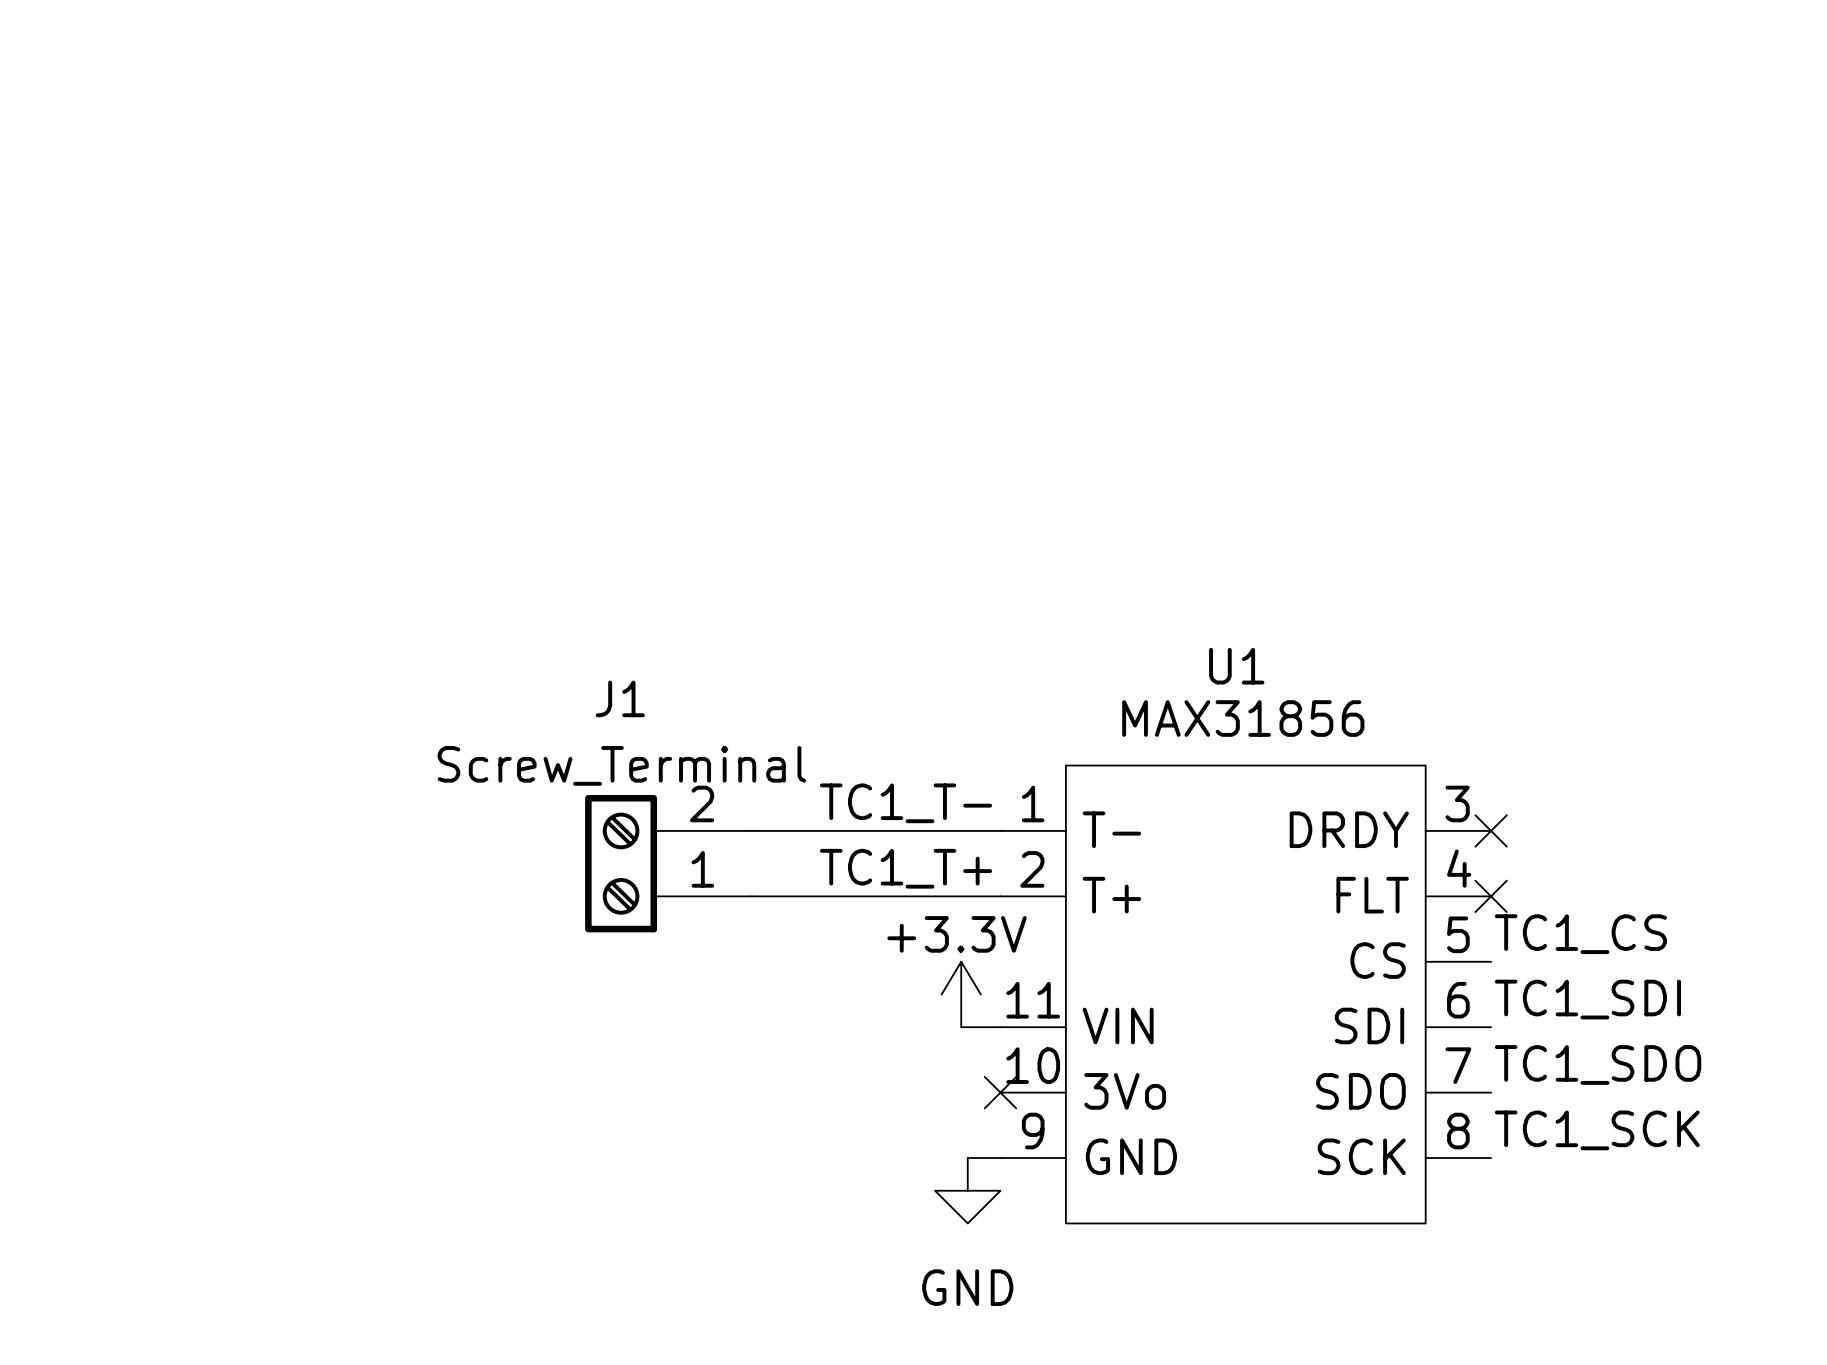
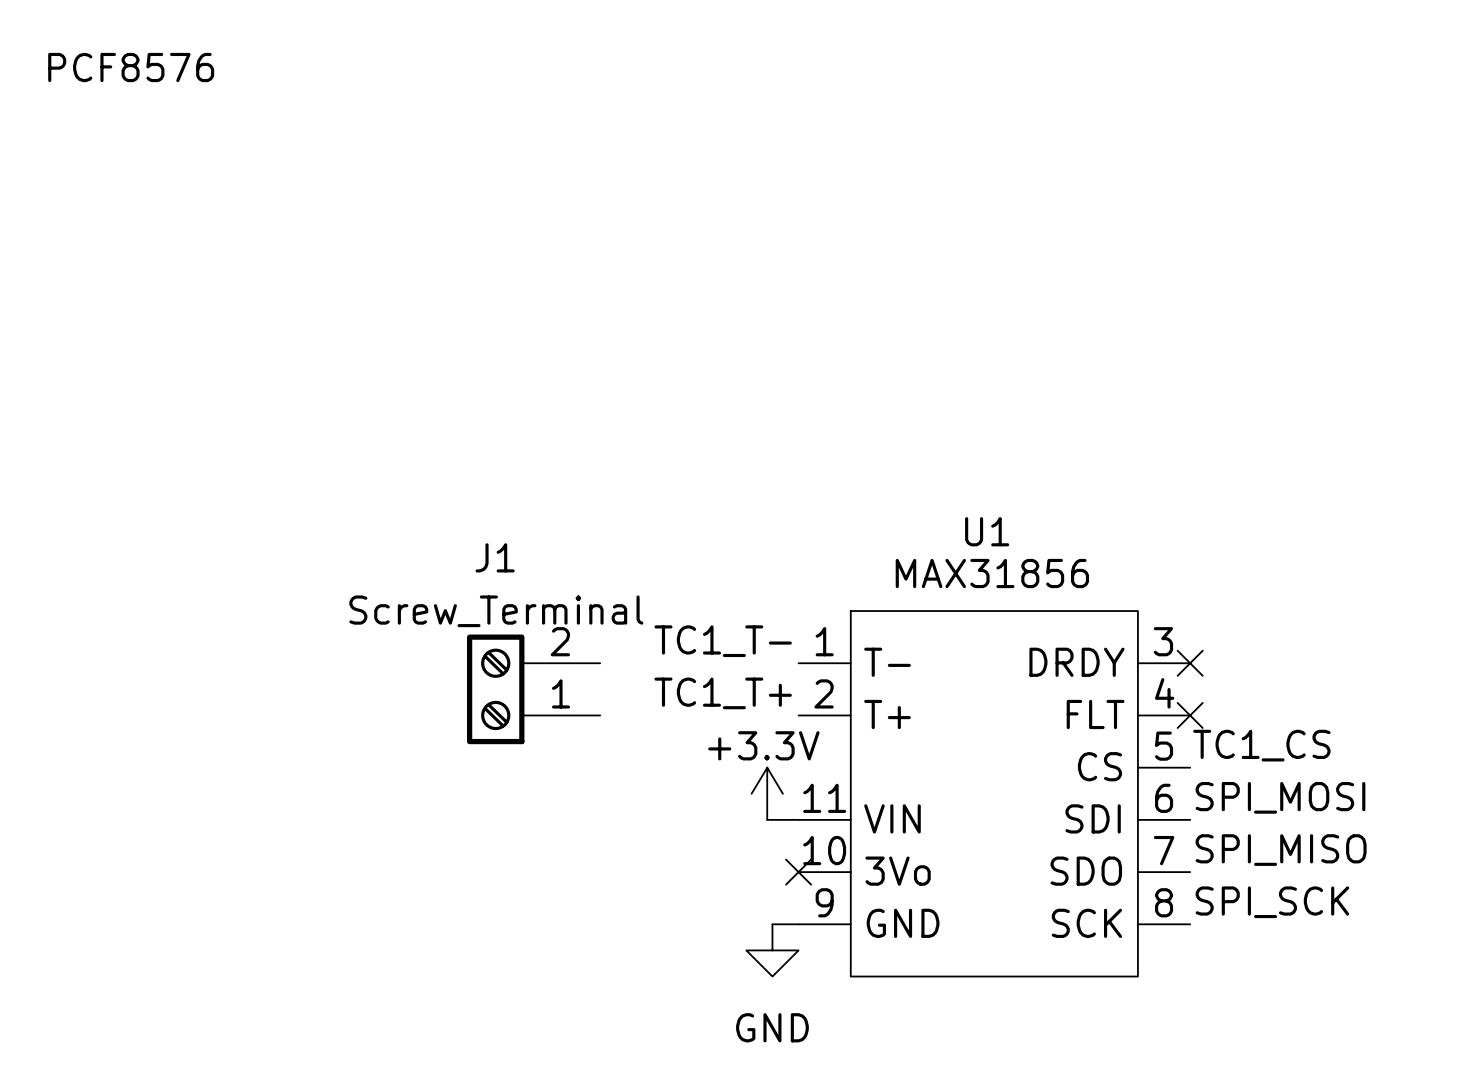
text: none -> PCF8576 (131, 67)
wire: (751, 830) (1000, 830) -> none
wire: (751, 896) (1000, 896) -> none
label: TC1_SDI (1587, 999) -> SPI_MOSI (1280, 797)
label: TC1_SDO (1598, 1064) -> SPI_MISO (1281, 850)
label: TC1_SCK (1597, 1130) -> SPI_SCK (1272, 902)

